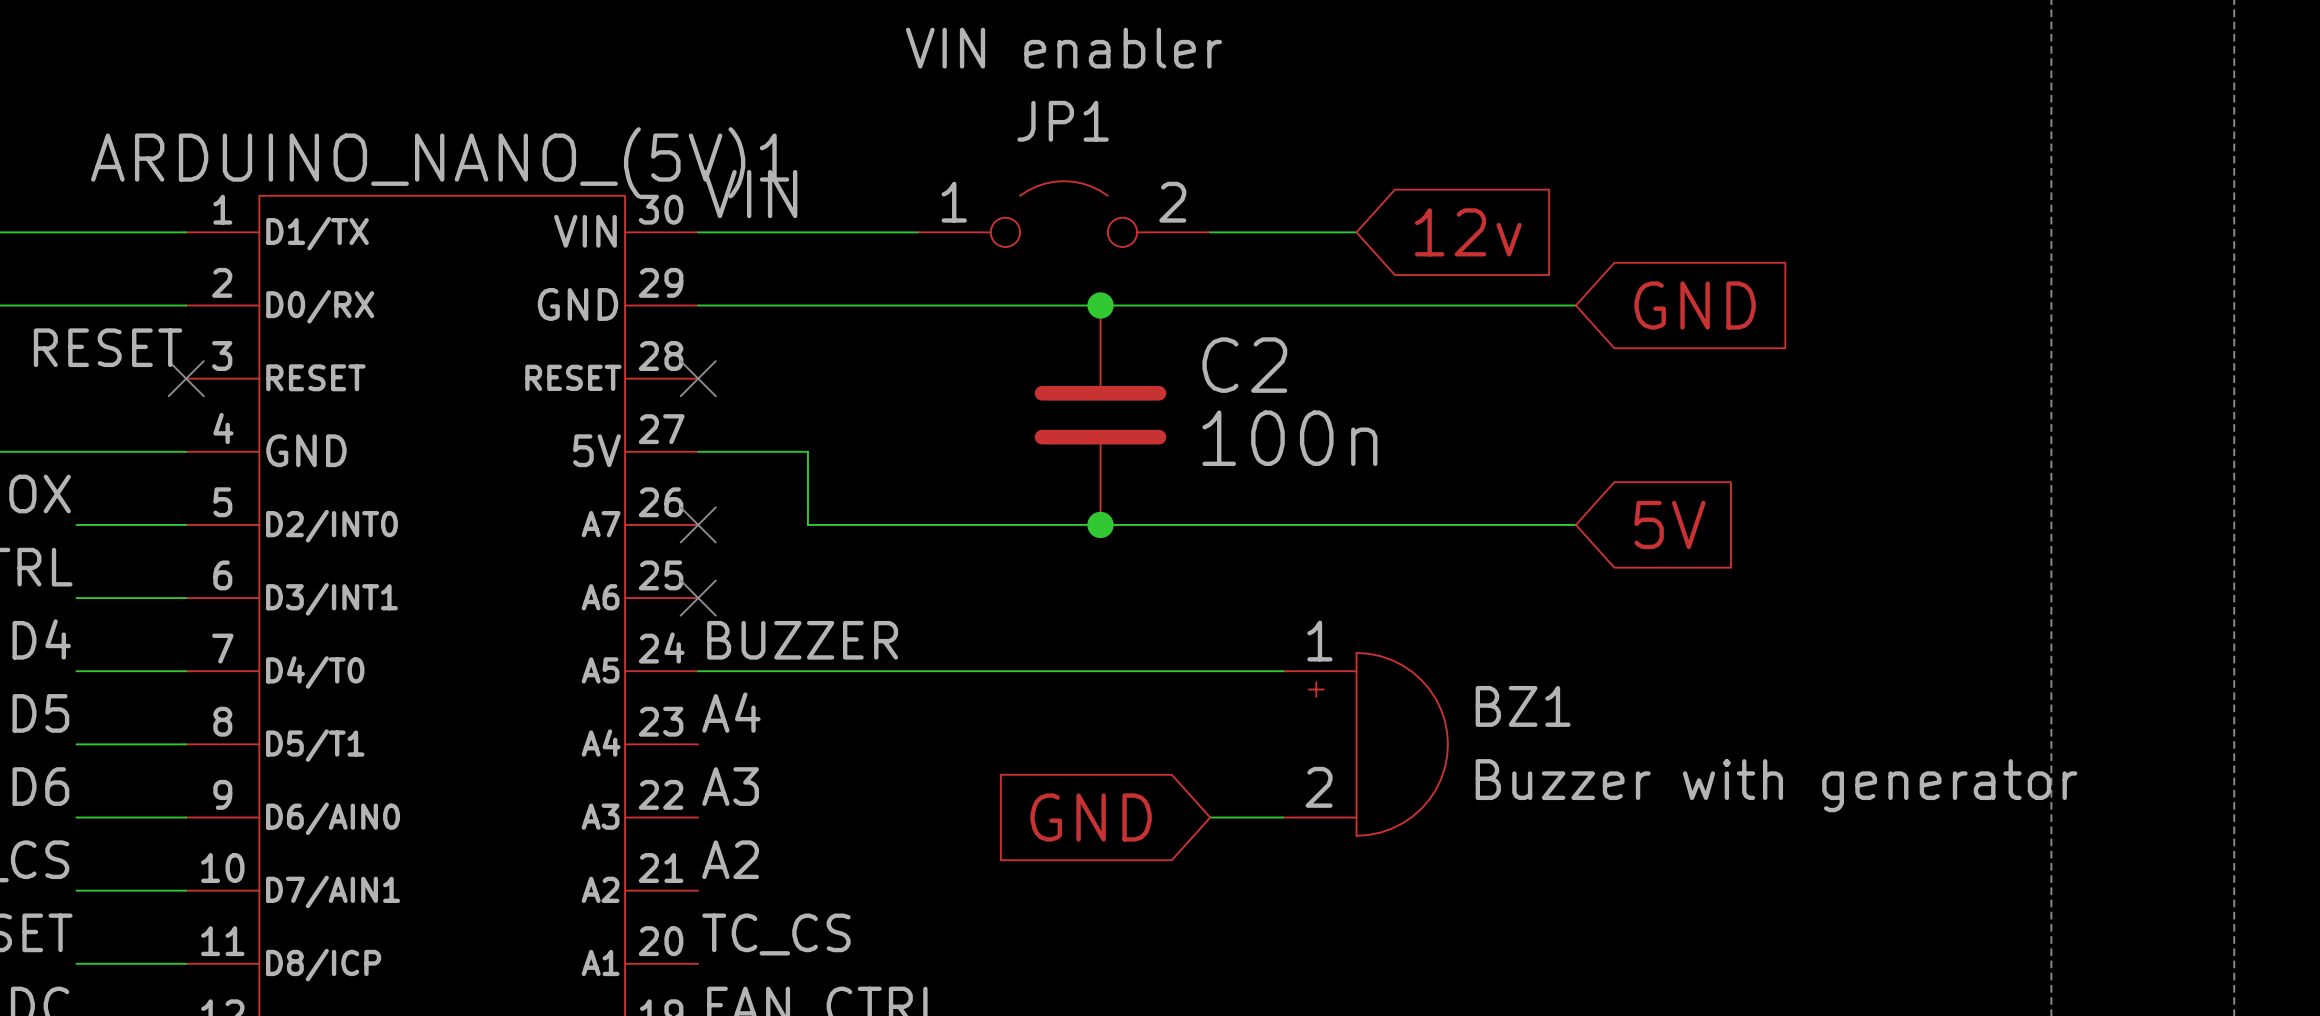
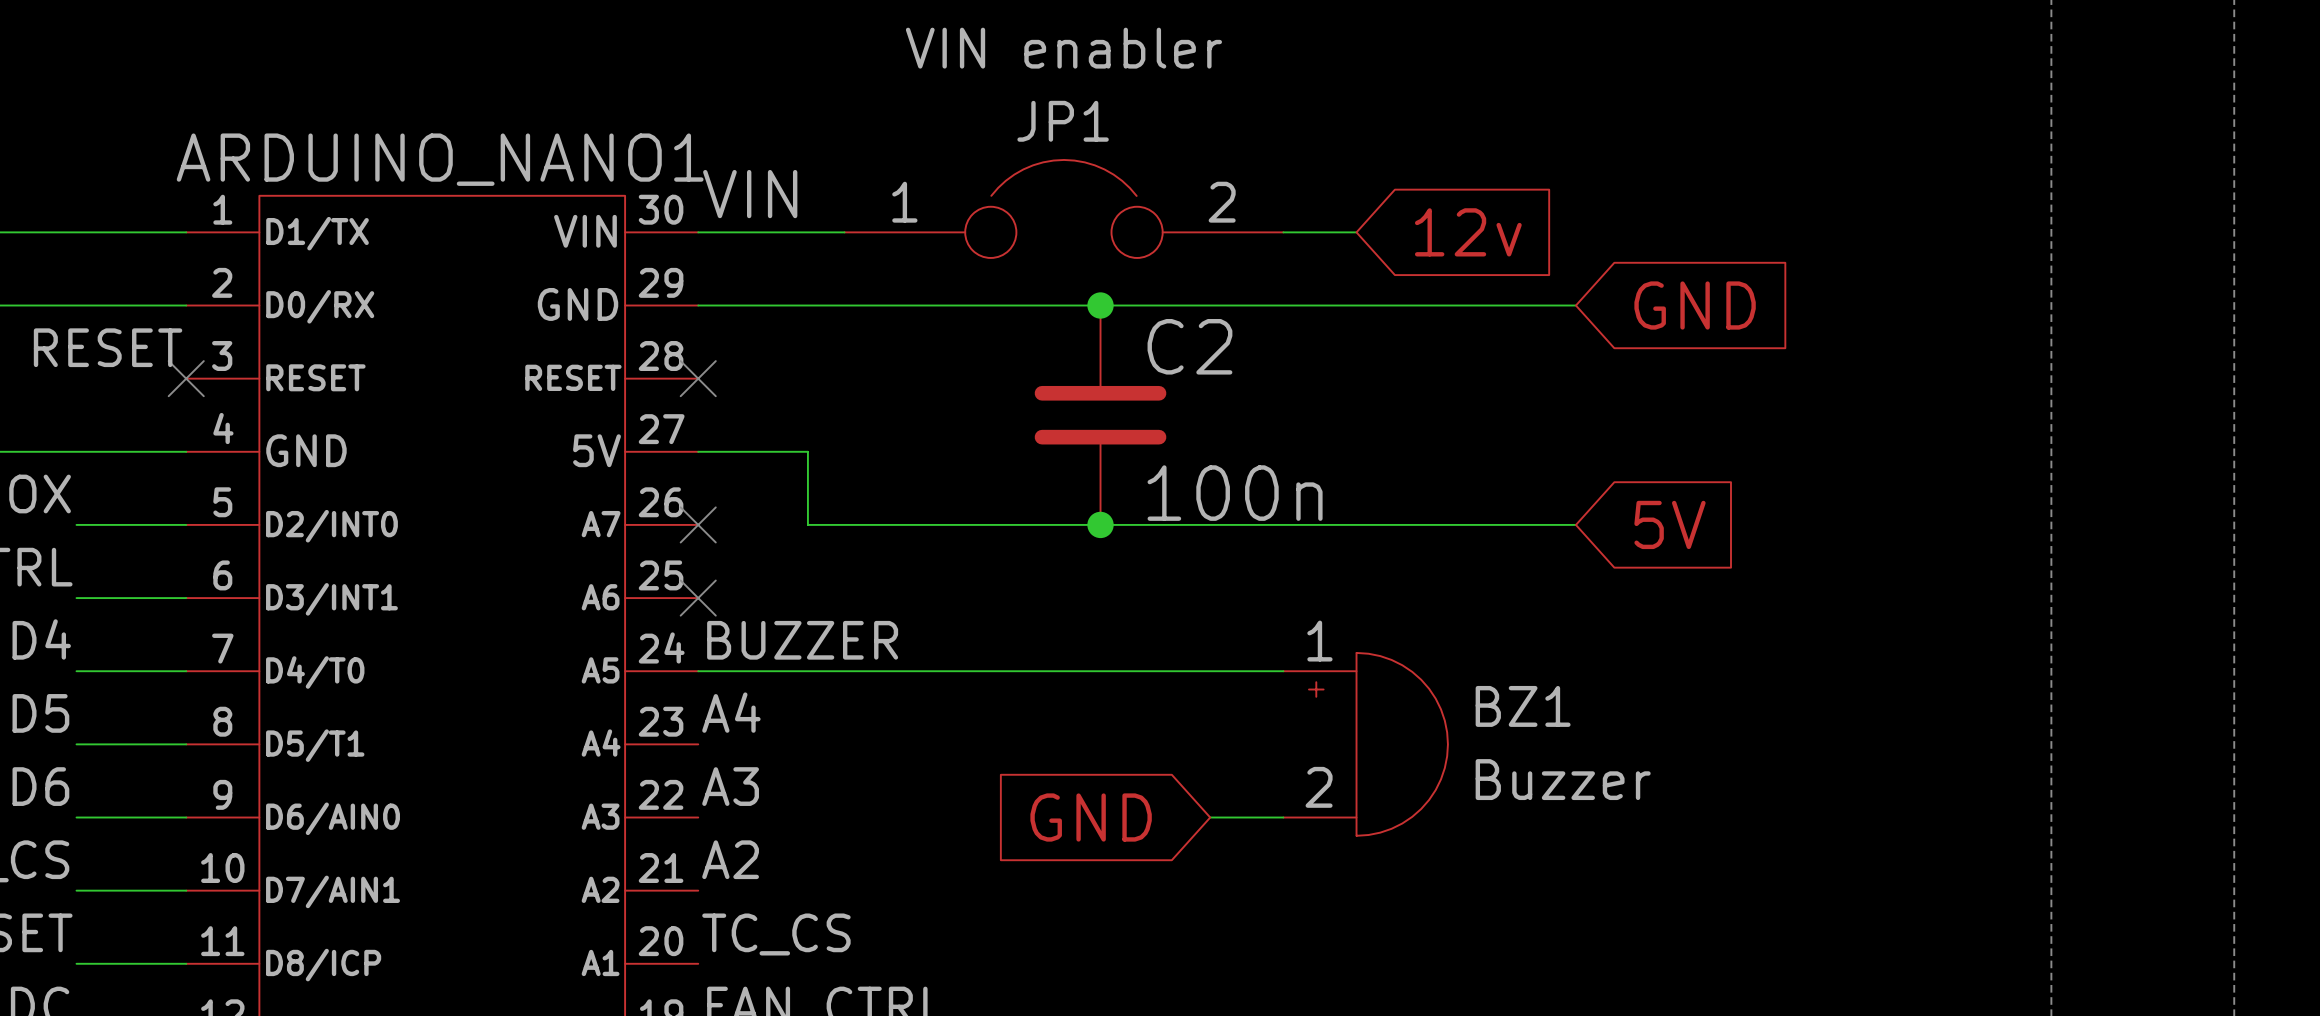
ARDUINO_NANO_(5V)1 name: ARDUINO_NANO_(5V)1 (440, 162) -> ARDUINO_NANO1 (440, 159)
JP1 symbol: [917, 181, 1211, 247] -> [844, 159, 1284, 258]
C2 name position: C2 (1244, 365) -> C2 (1189, 346)
C2 value position: 100n (1289, 438) -> 100n (1235, 493)
BZ1 value: Buzzer with generator (1776, 785) -> Buzzer (1563, 779)

